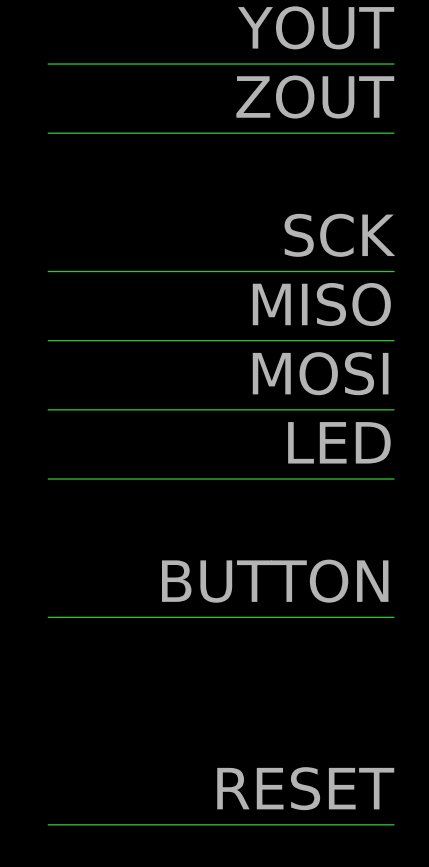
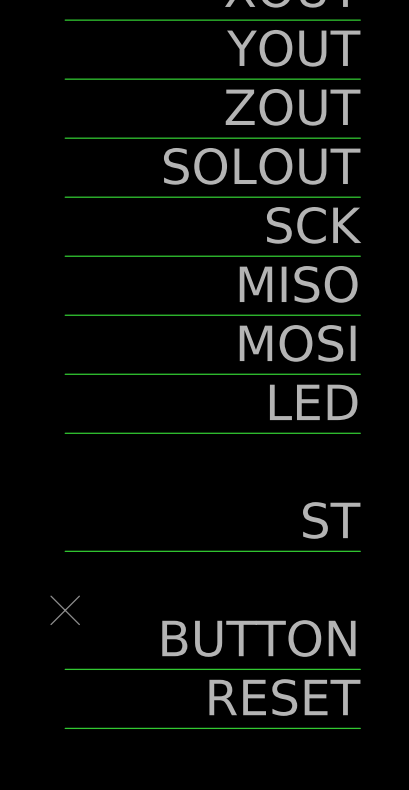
label: none -> SOLOUT (262, 166)
wire: none -> (65, 197) (360, 197)
label: BUTTON (275, 581) -> ST (331, 520)
no-connect mark: none -> (65, 610)
label: none -> BUTTON (258, 638)
wire: none -> (65, 669) (360, 669)

